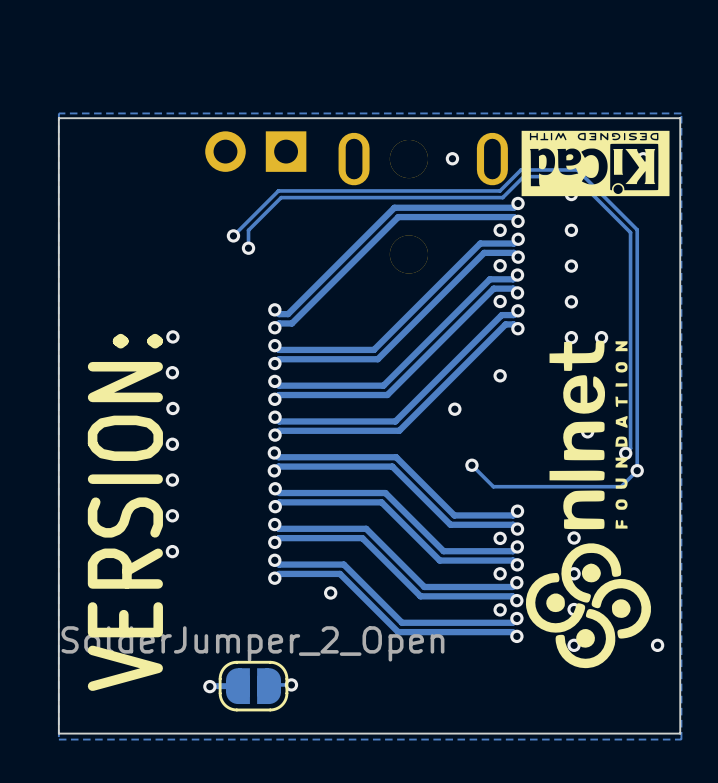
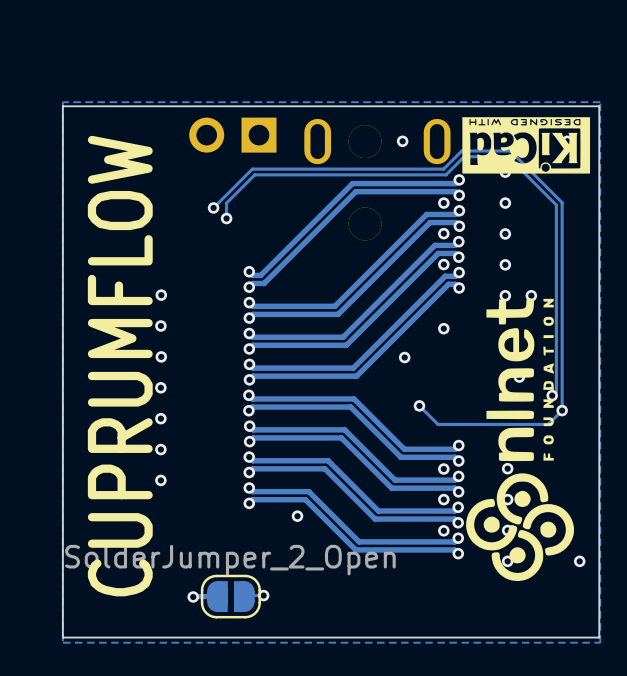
text: VERSION: (125, 512) -> CUPRUMFLOW (120, 366)

